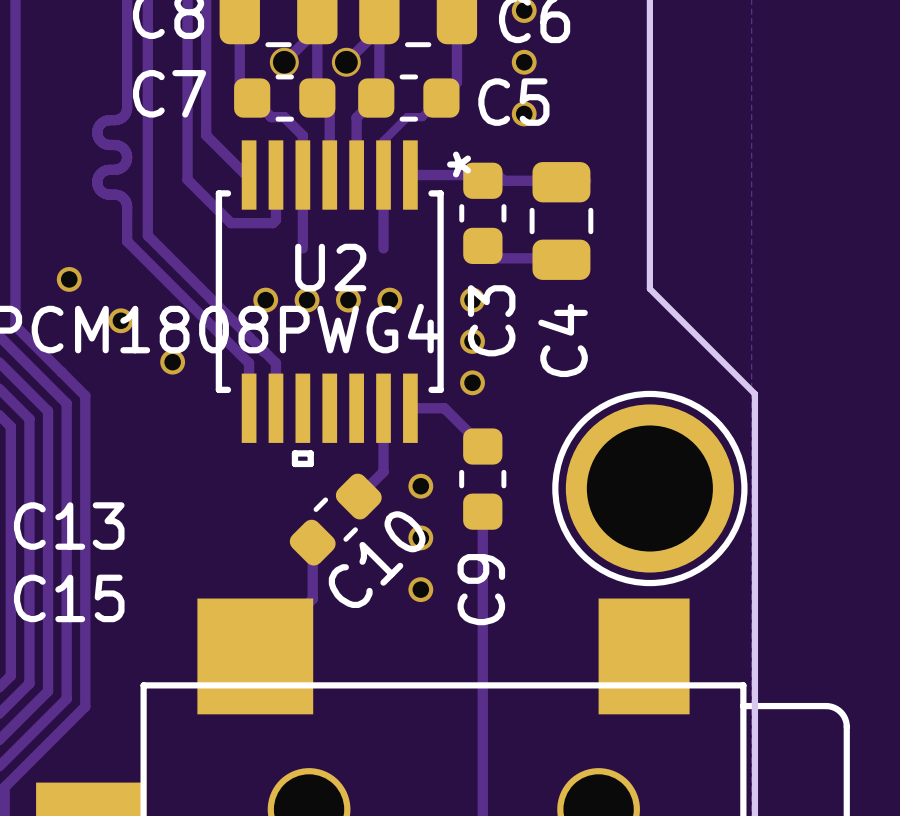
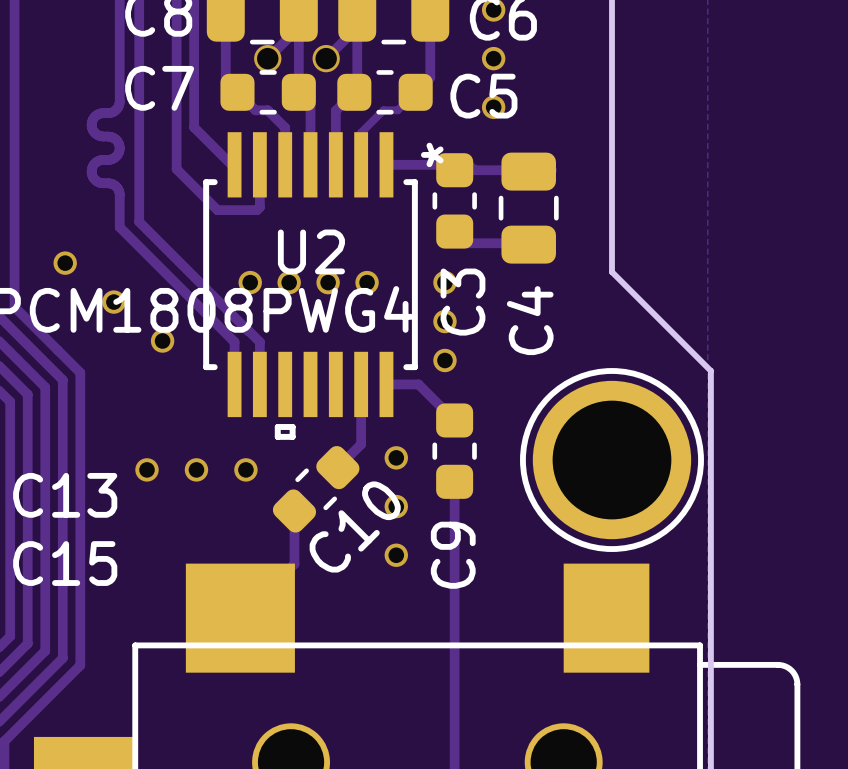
track: (302, 175) (302, 248) -> none
track: (383, 175) (383, 248) -> none
via: none -> (147, 469)
via: none -> (196, 469)
via: none -> (245, 469)

